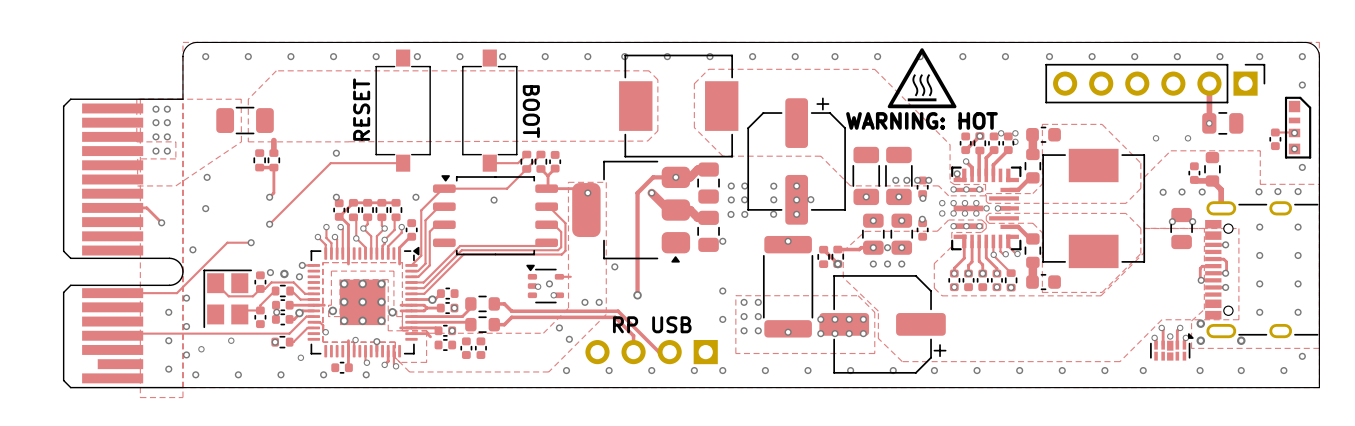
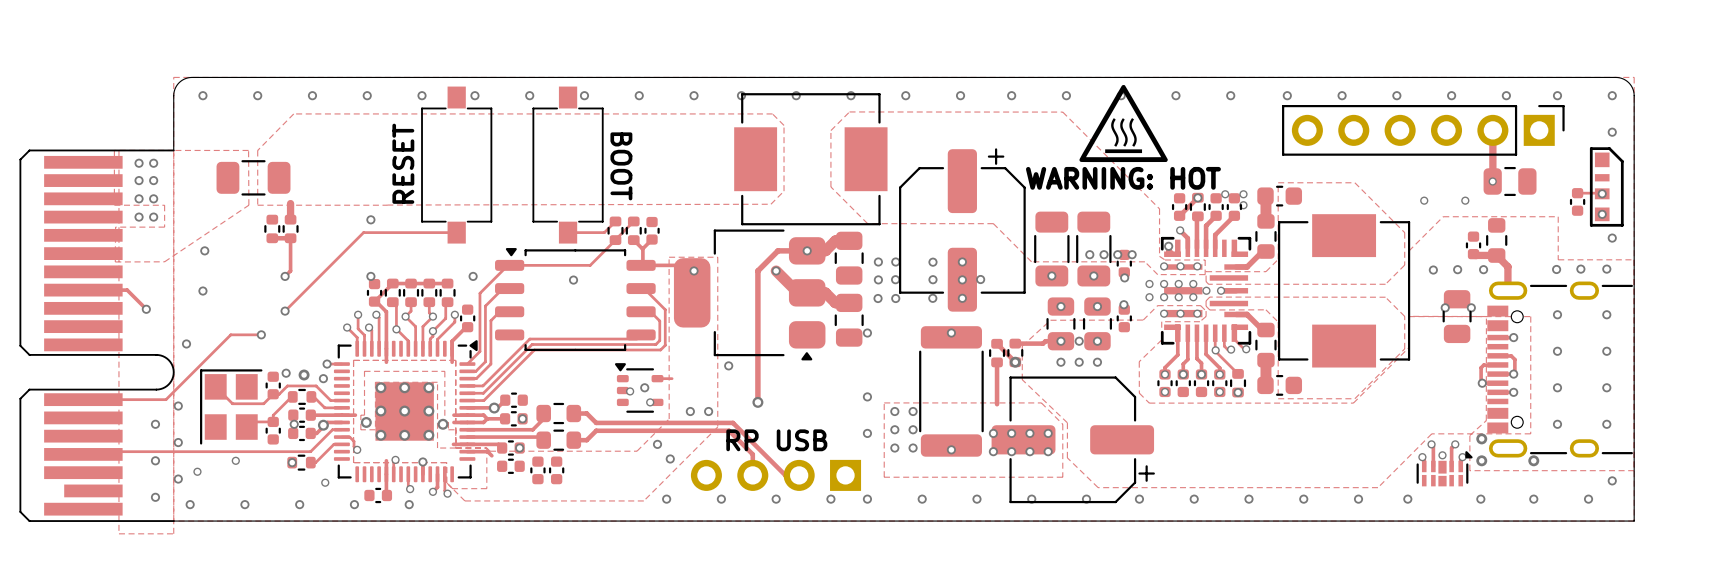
track: none -> (997, 362) (997, 404)

